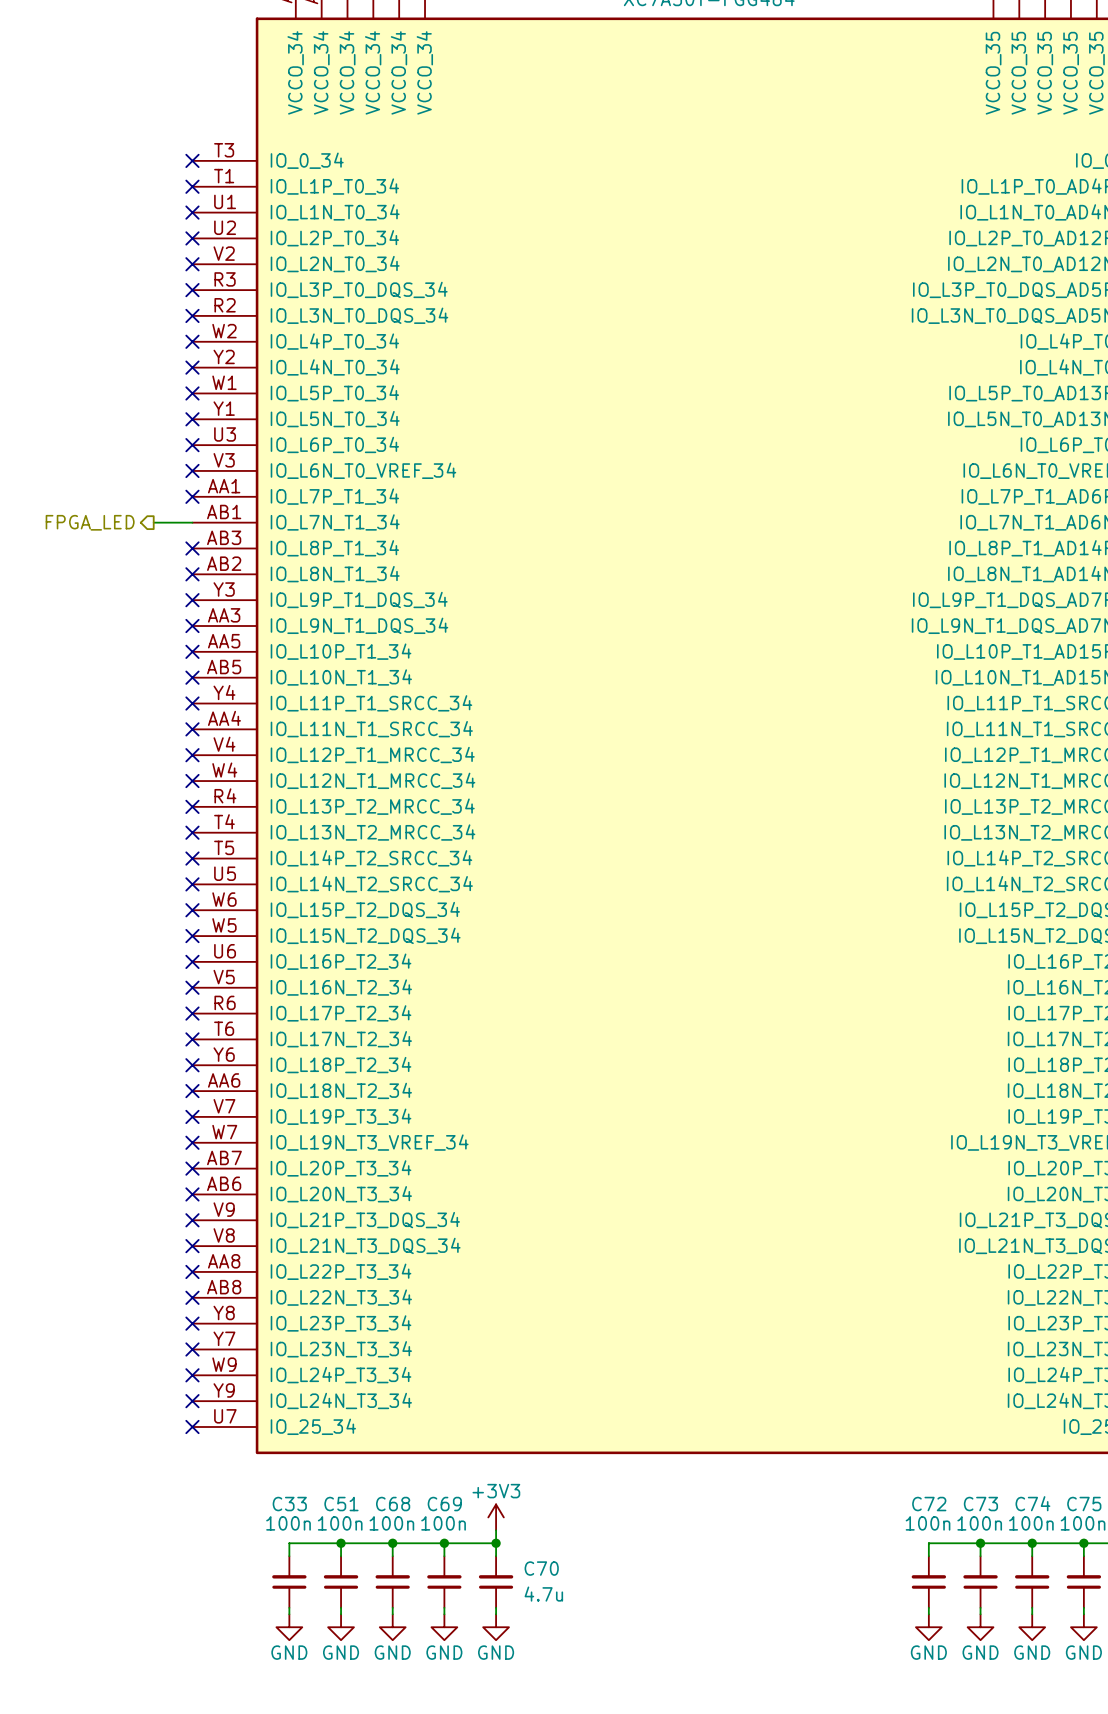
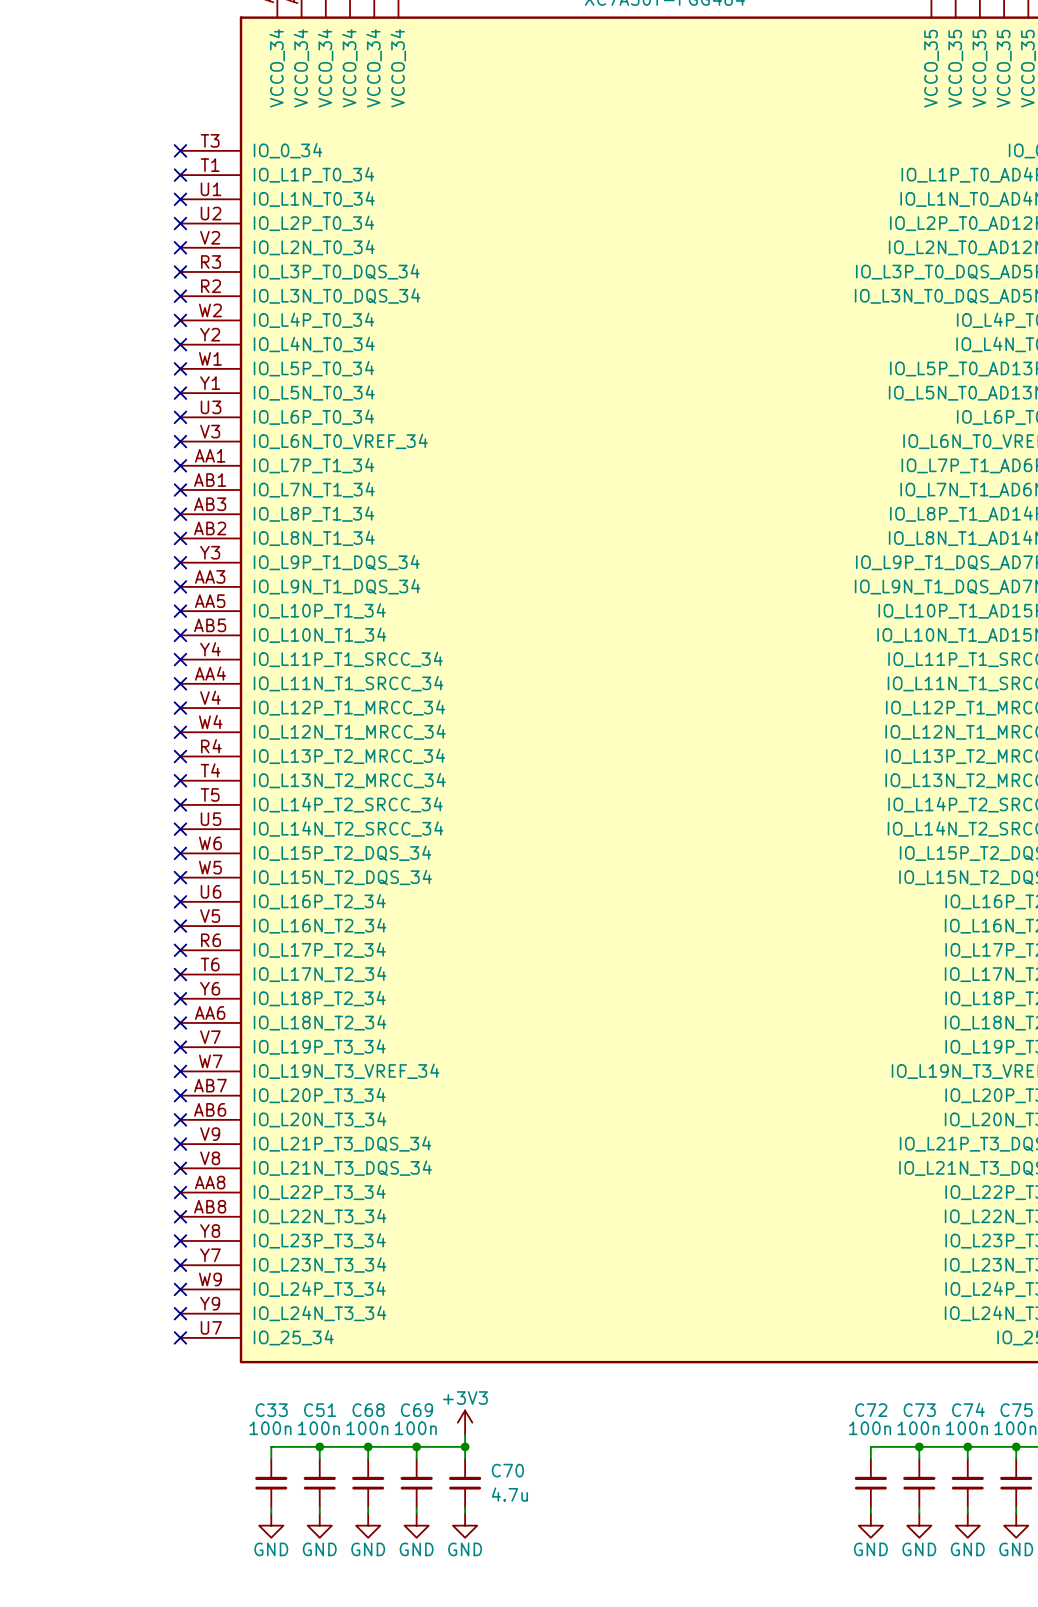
hierarchical label: FPGA_LED (90, 522) -> none
wire: (153, 522) (192, 522) -> none
no-connect mark: none -> (180, 490)

